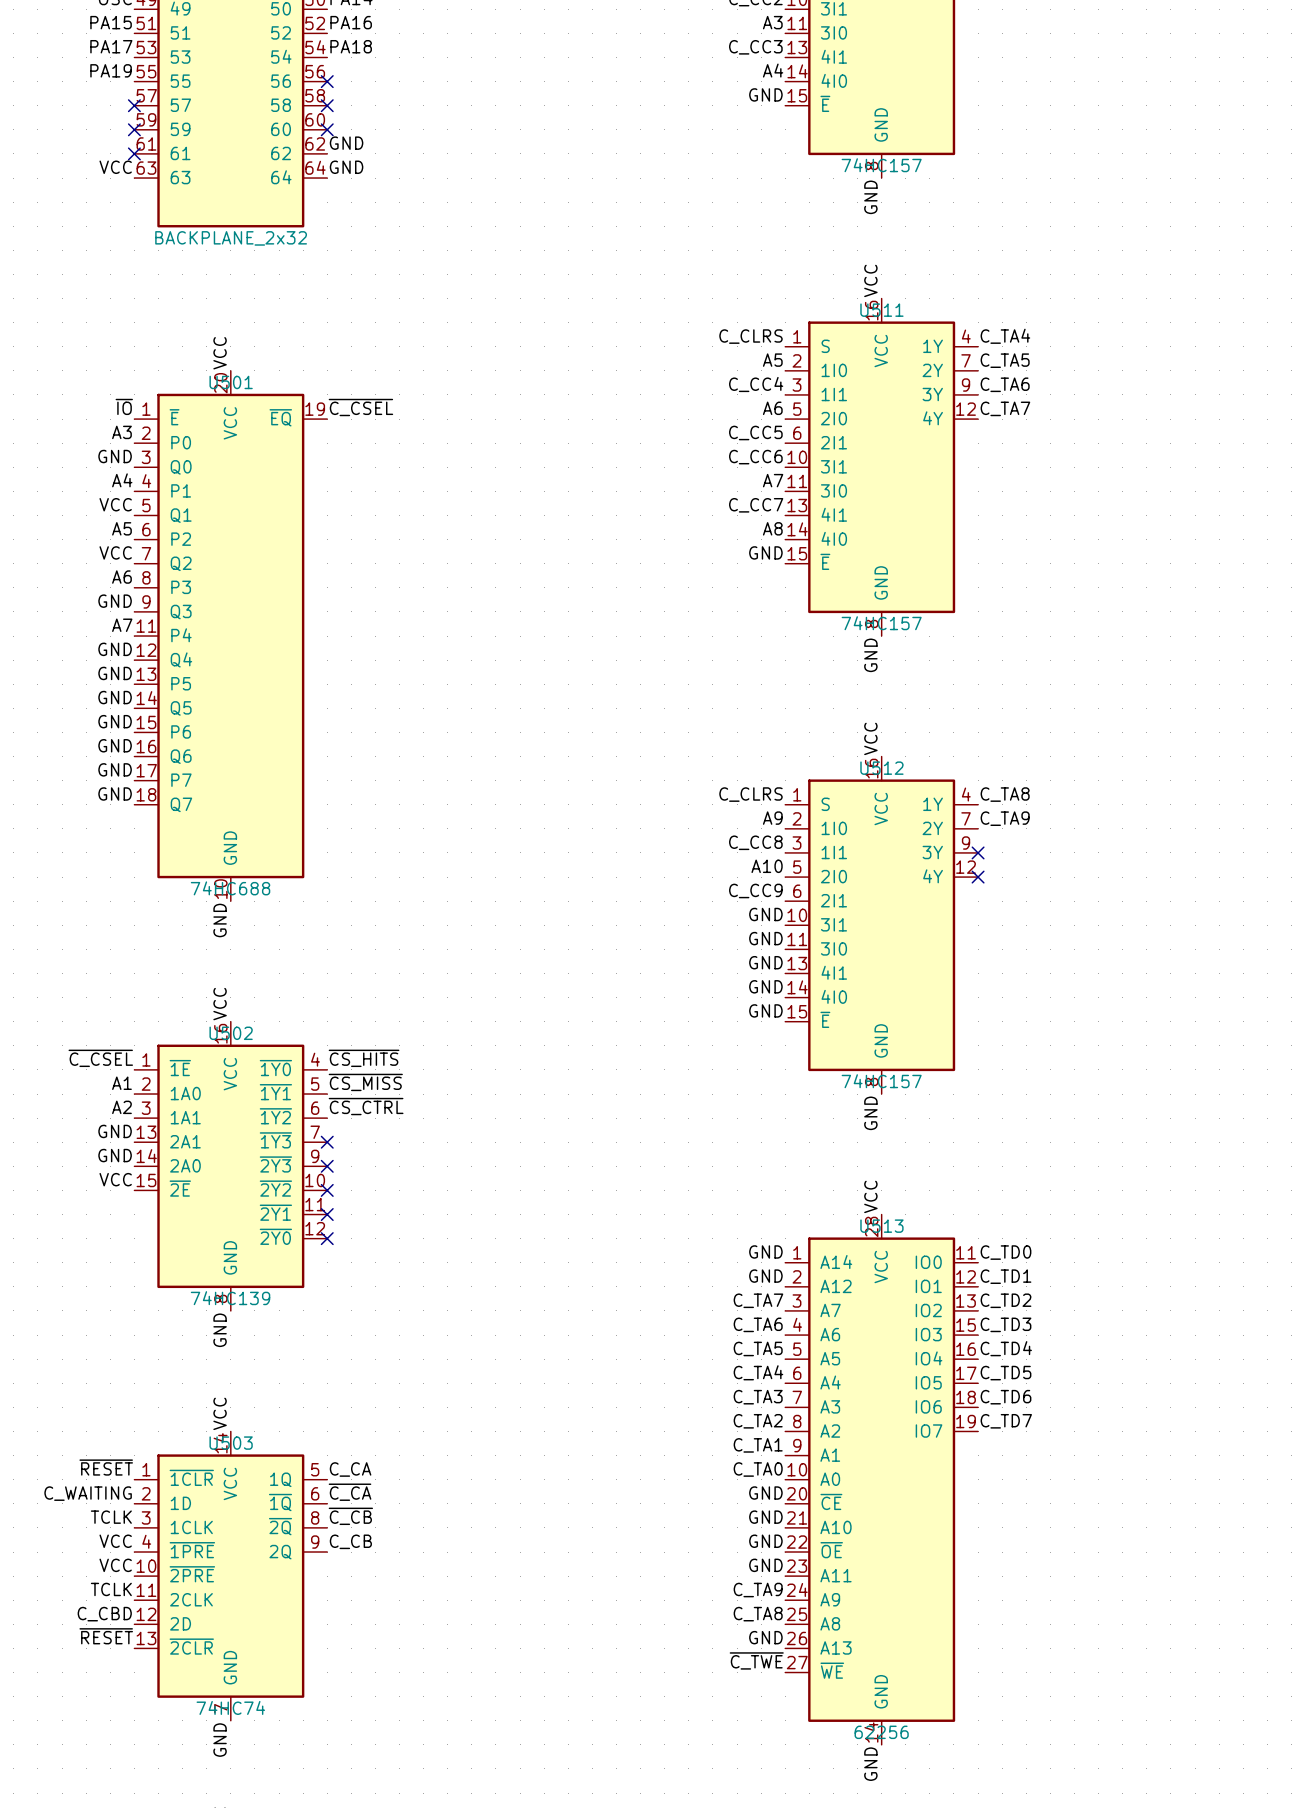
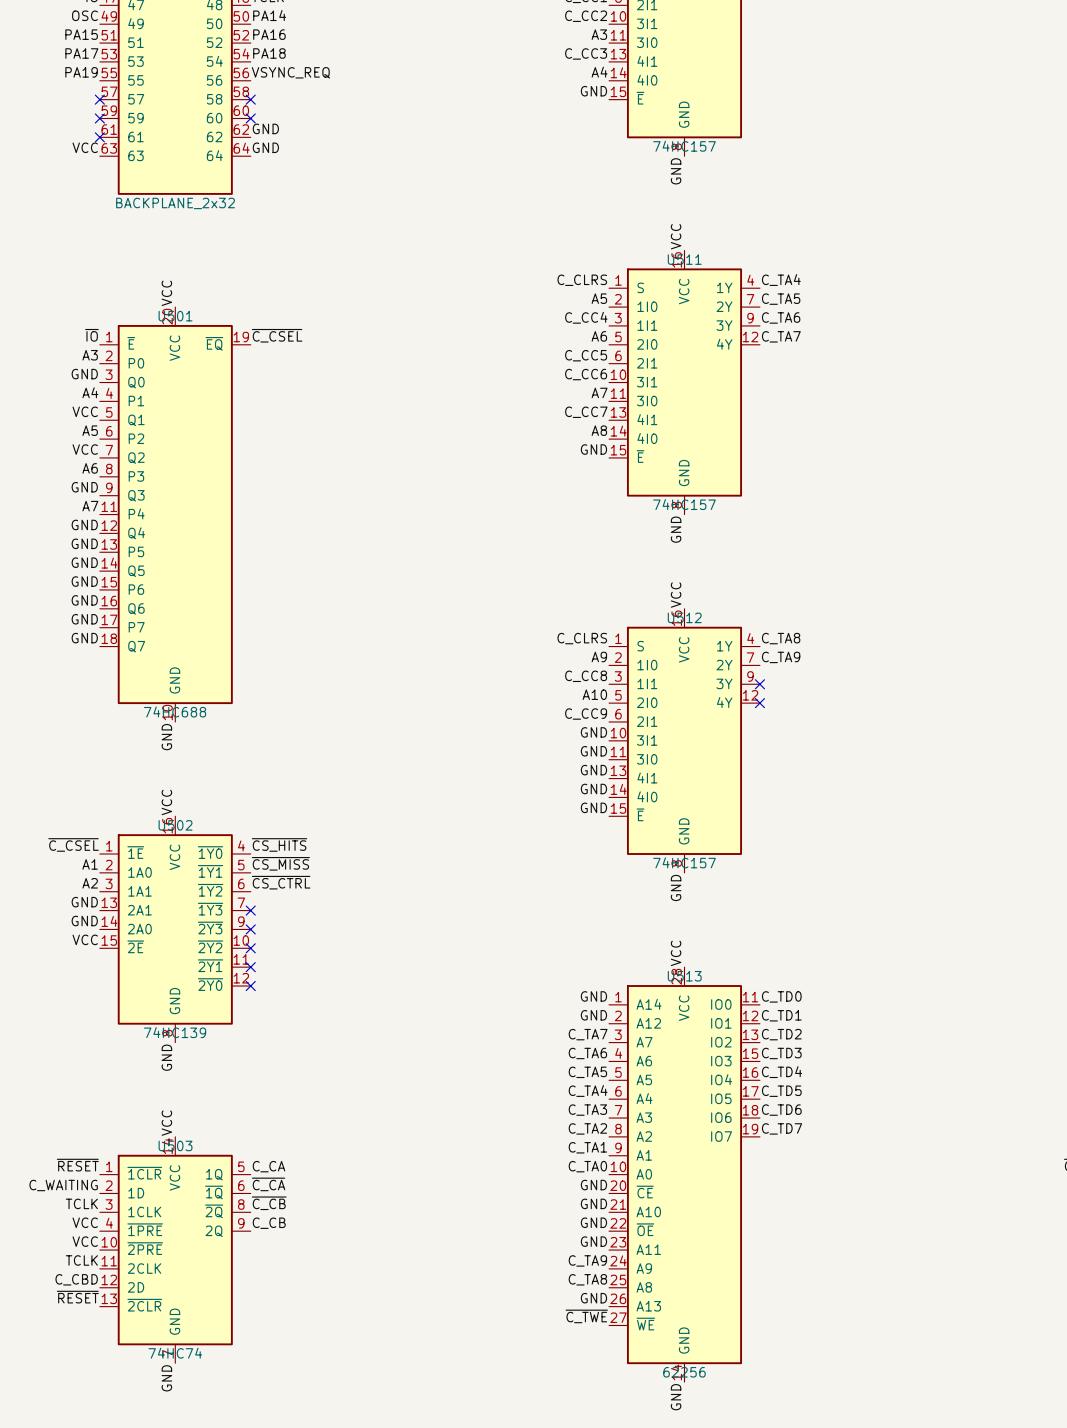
label: none -> VSYNC_REQ (290, 72)
no-connect mark: (327, 81) -> none

